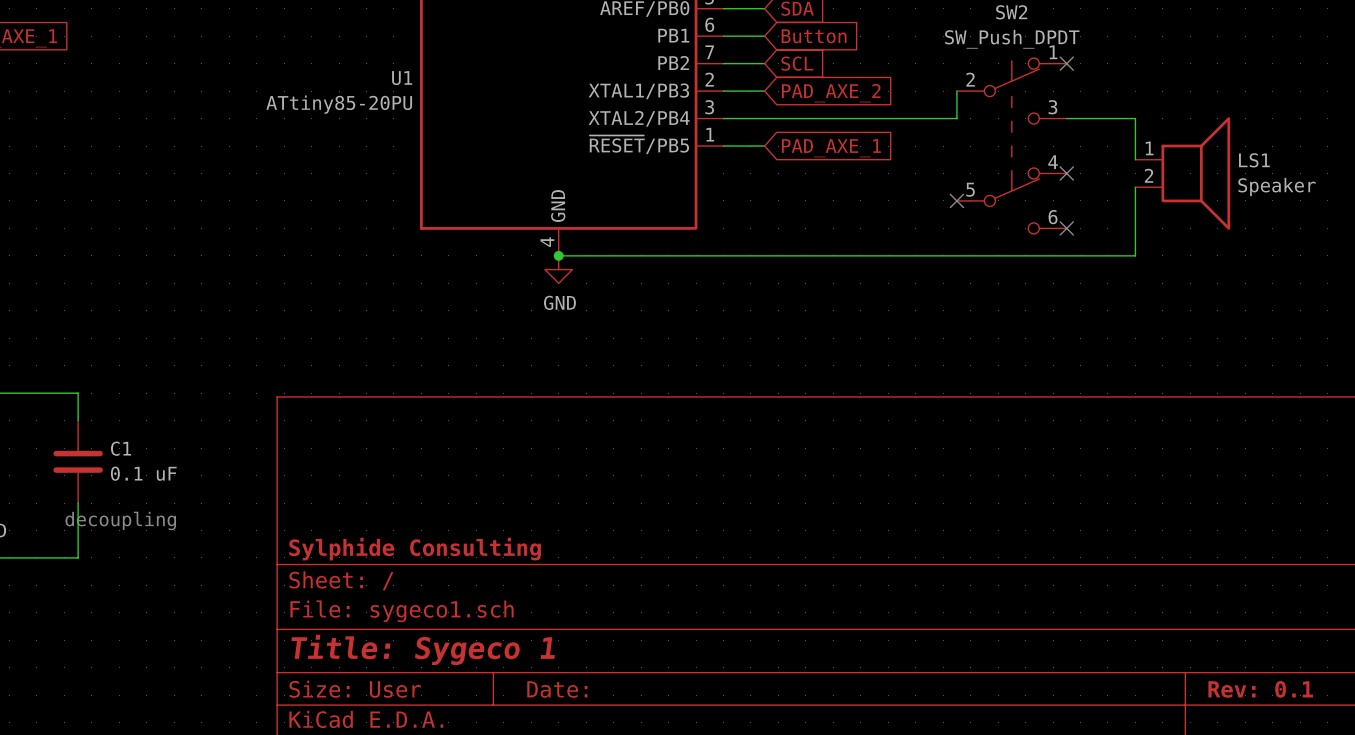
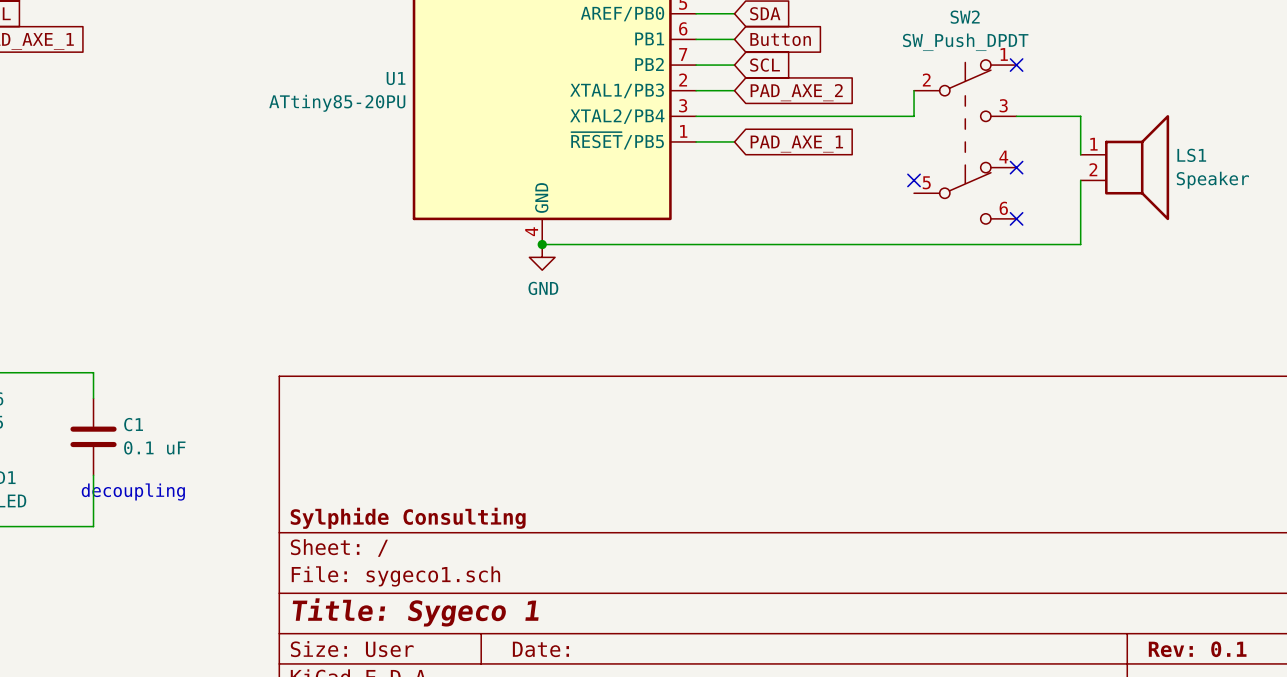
no-connect mark position: (956, 200) -> (914, 180)

